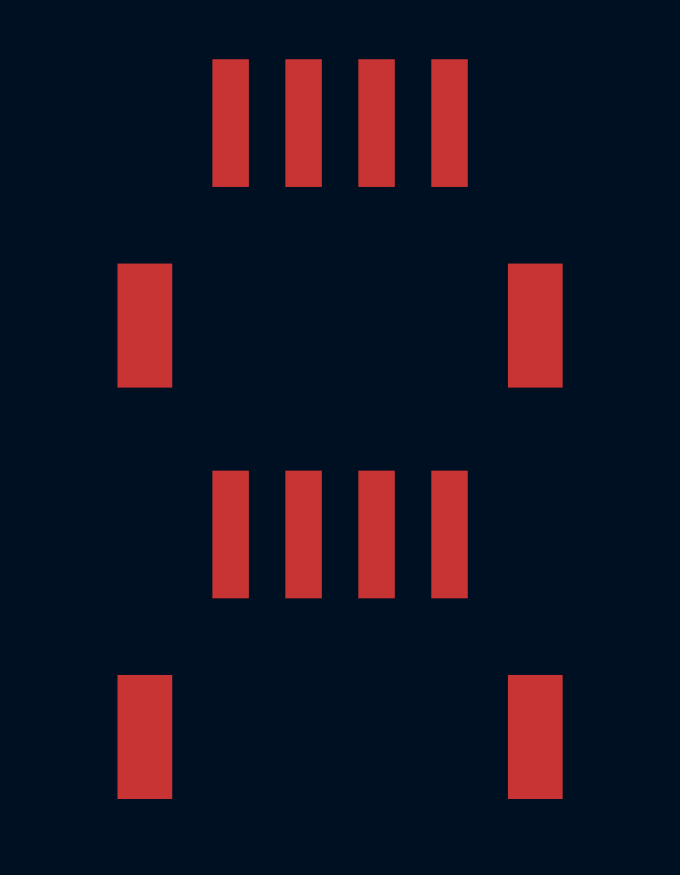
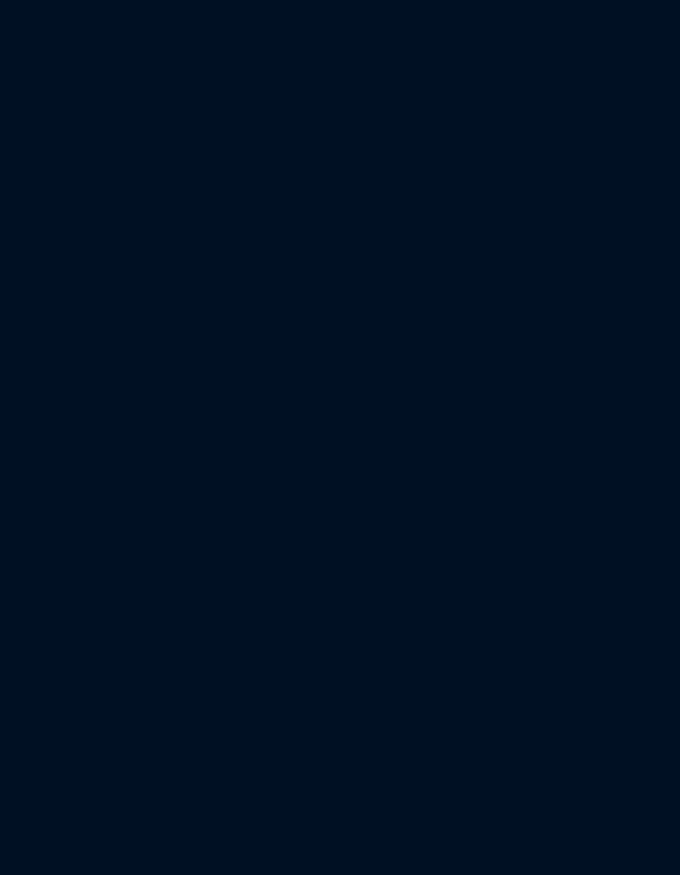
part: (340, 223) -> none
part: (340, 634) -> none

